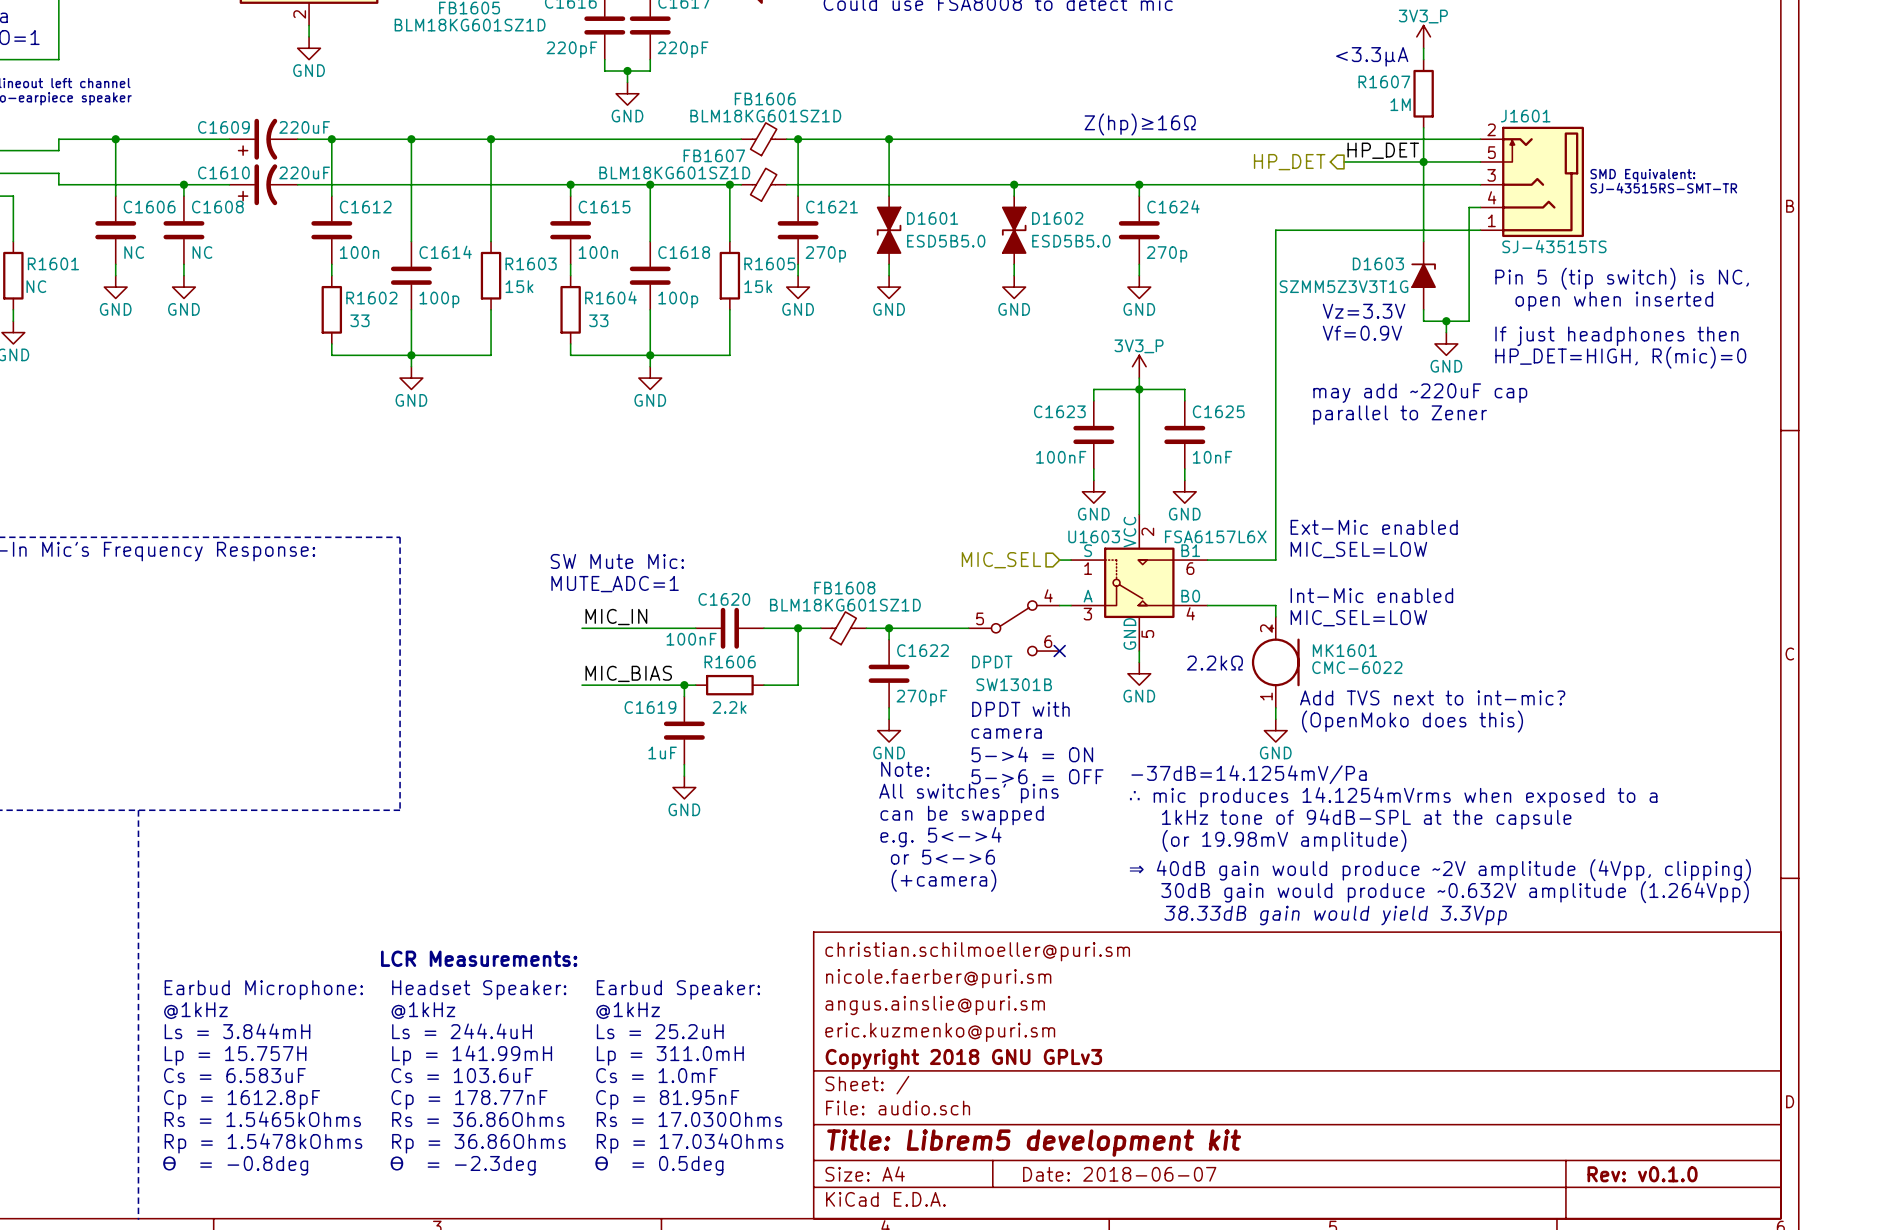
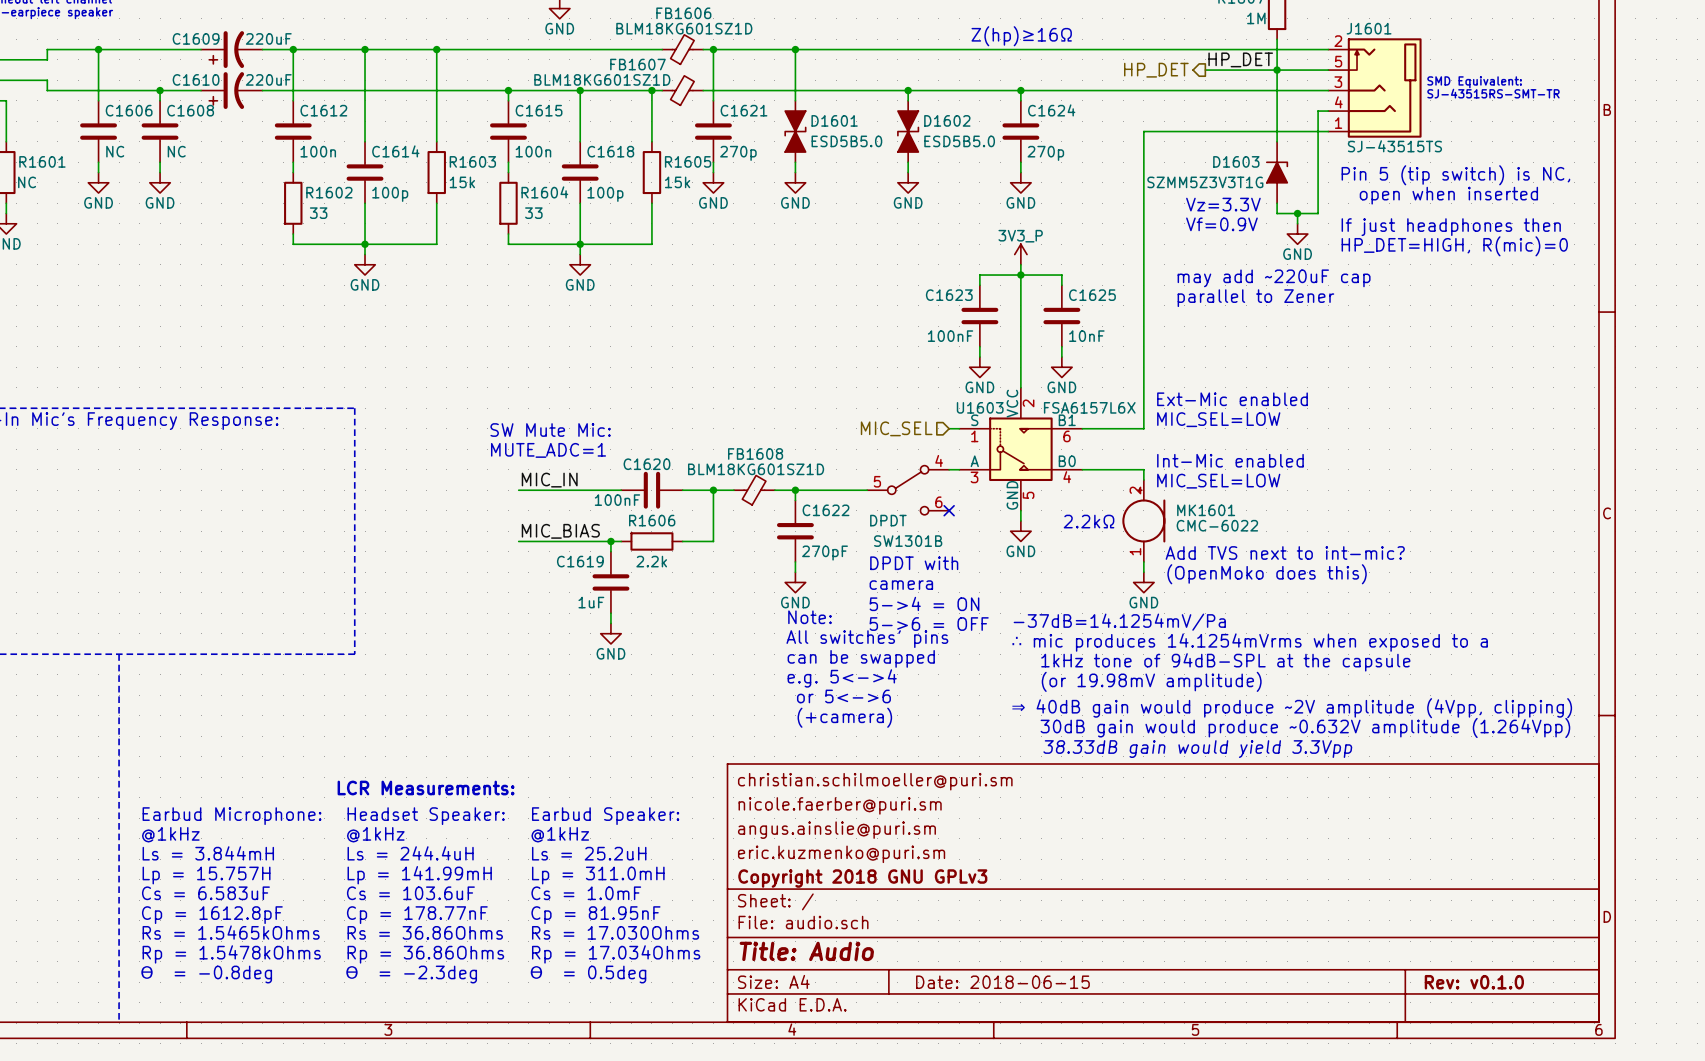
title block: Title: Librem5 development kit (1034, 1143) -> Title: Audio (806, 951)
title block: Date: 2018-06-07 (1119, 1174) -> Date: 2018-06-15 (1002, 982)

